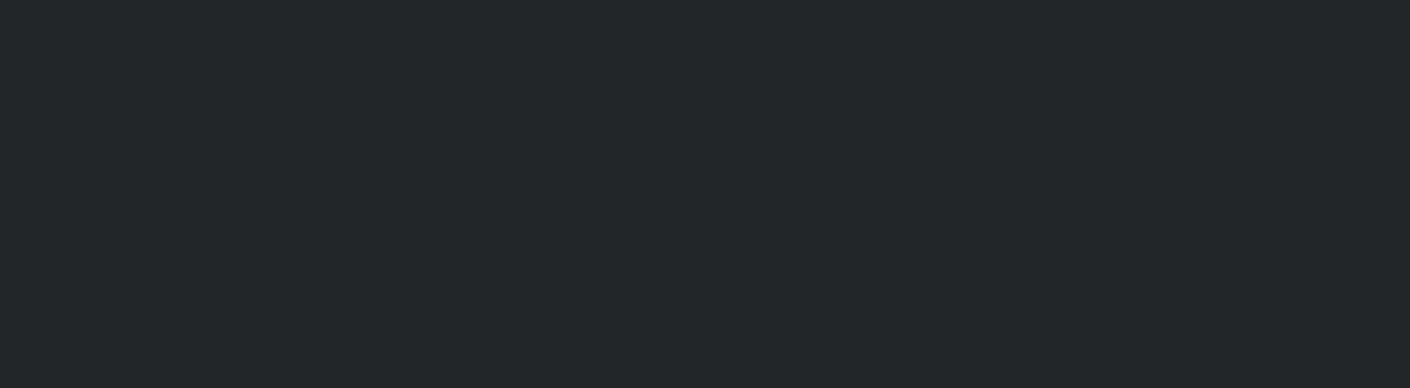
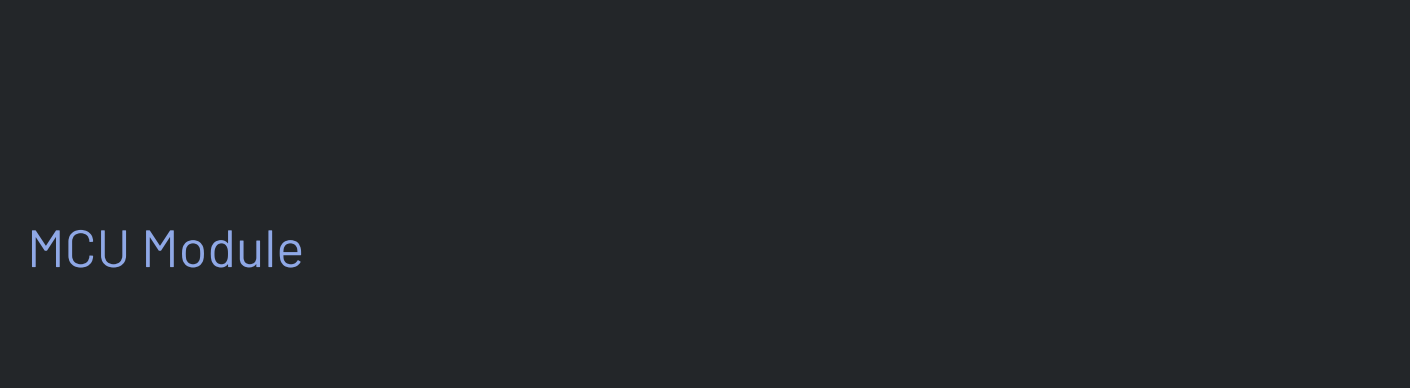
text: none -> MCU Module (166, 248)

